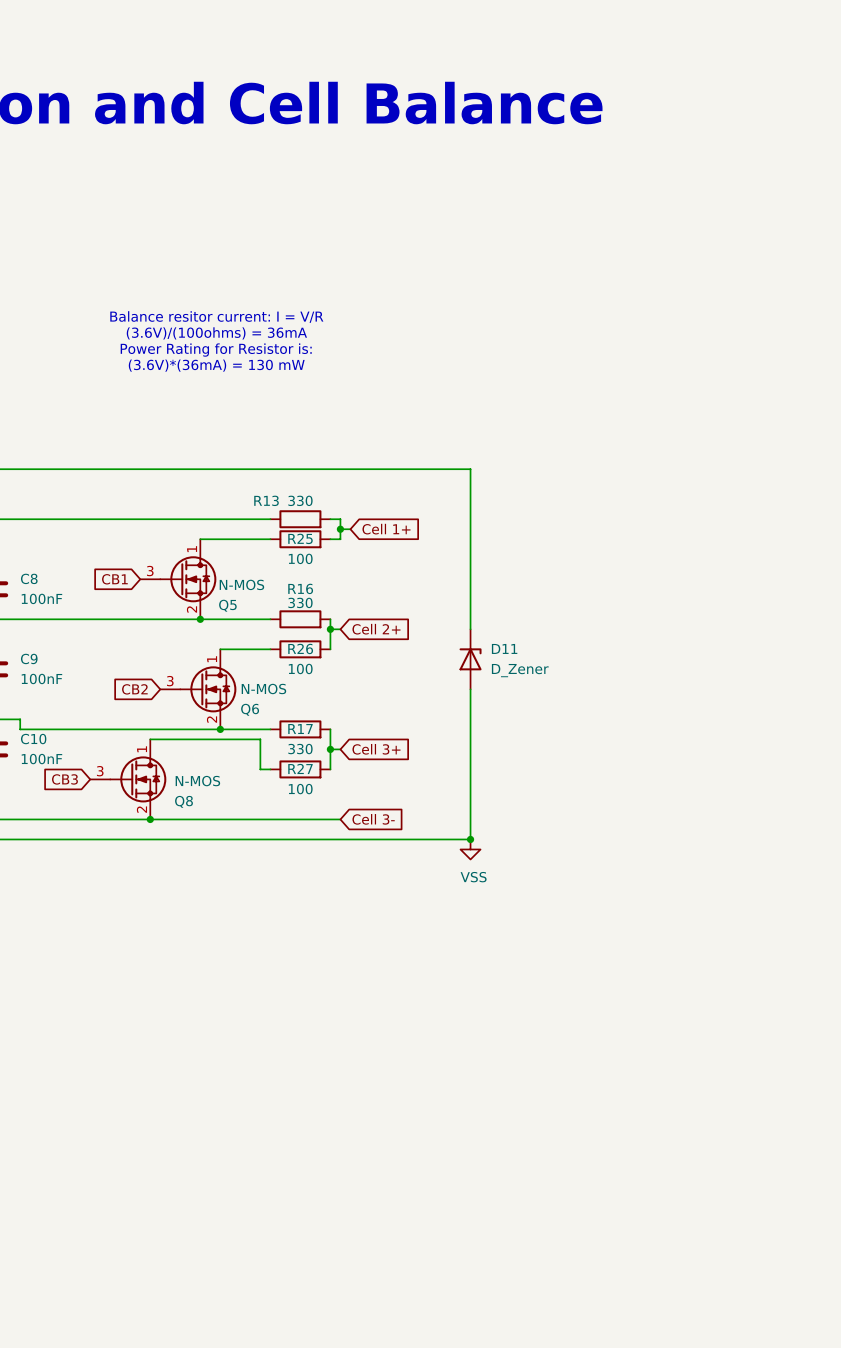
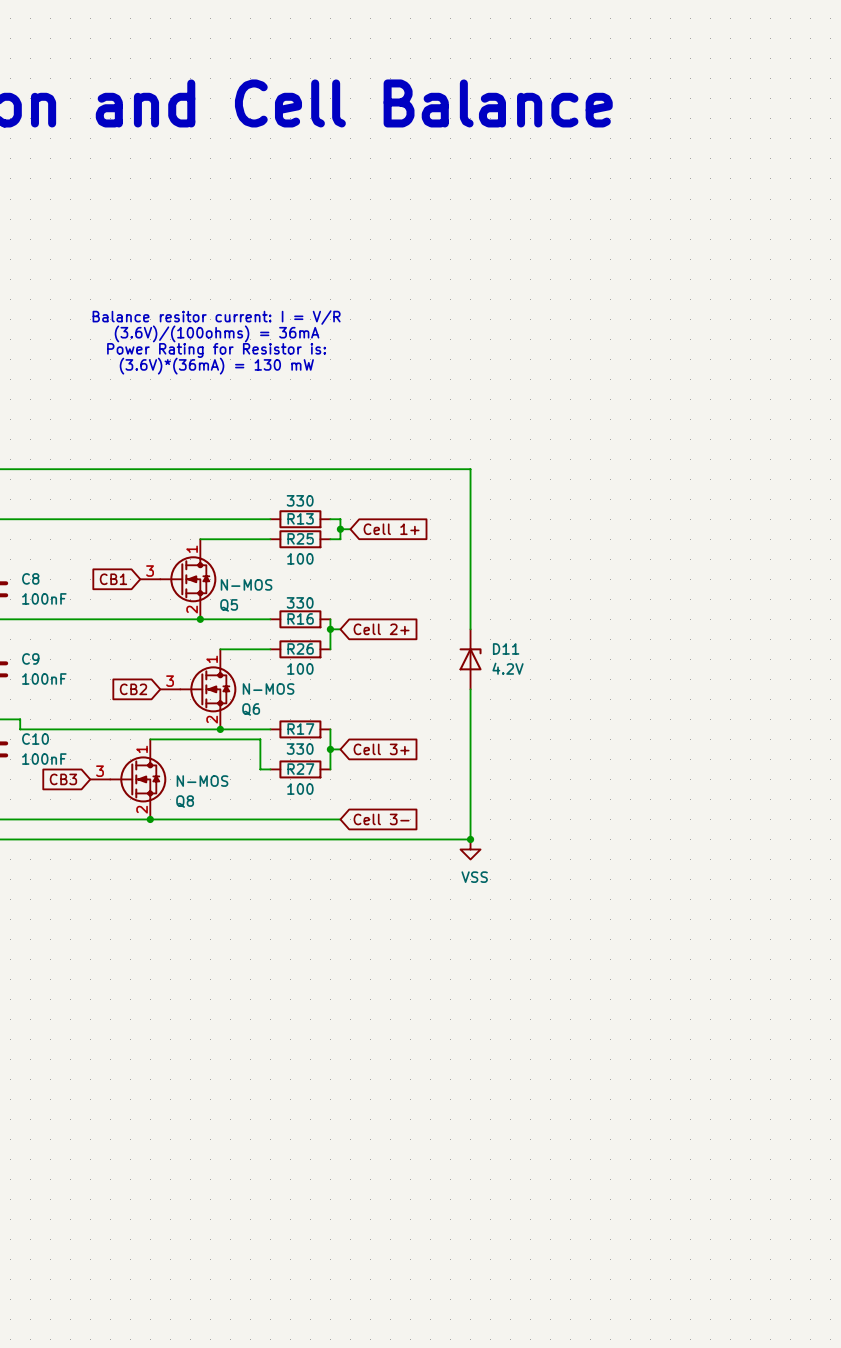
R13 name position: R13 (266, 500) -> R13 (300, 518)
R16 name position: R16 (300, 588) -> R16 (300, 618)
D11 value: D_Zener (520, 670) -> 4.2V (508, 668)

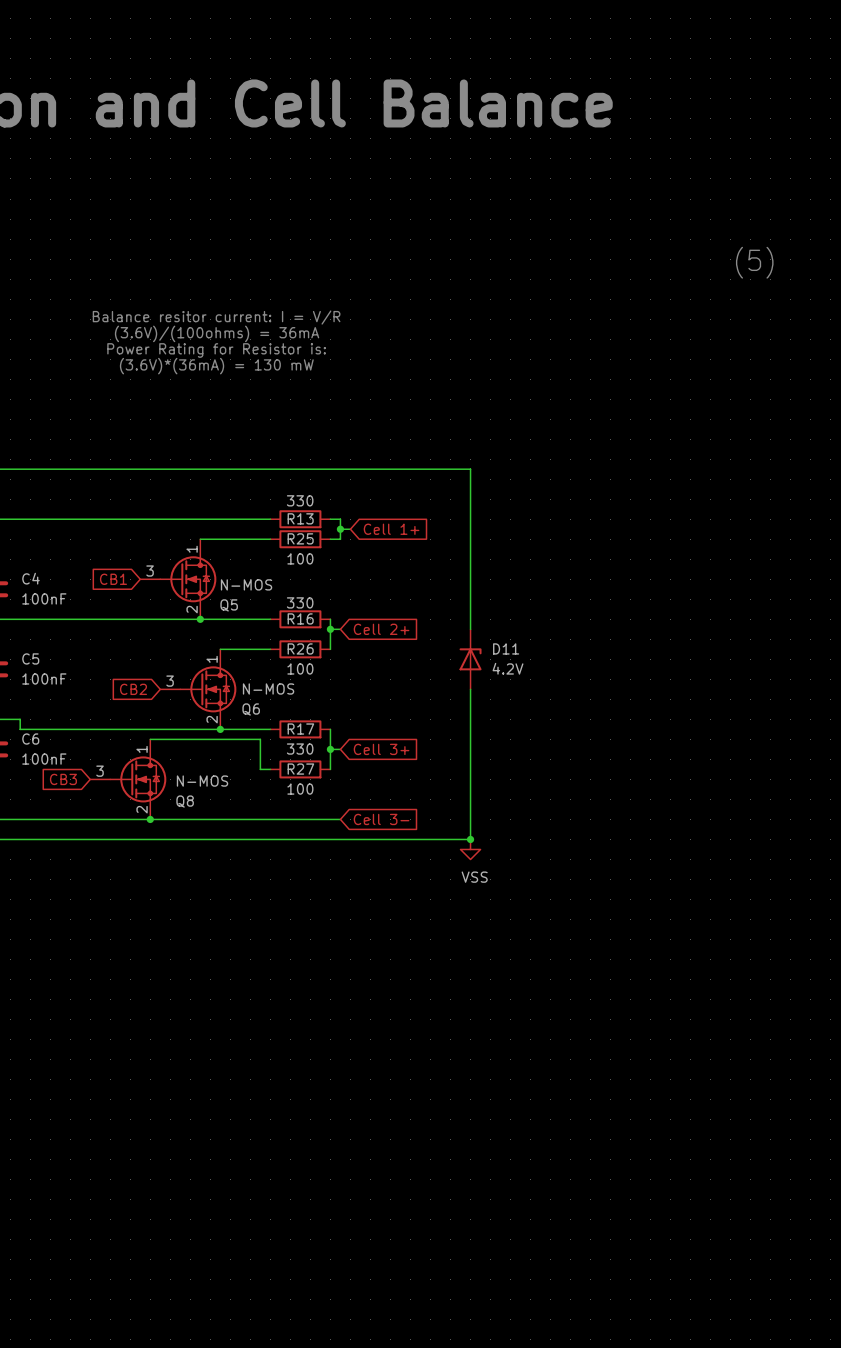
text: none -> (5) (754, 262)
C8 name: C8 (30, 578) -> C4 (31, 578)
C9 name: C9 (30, 658) -> C5 (30, 658)
C10 name: C10 (35, 739) -> C6 (30, 739)

